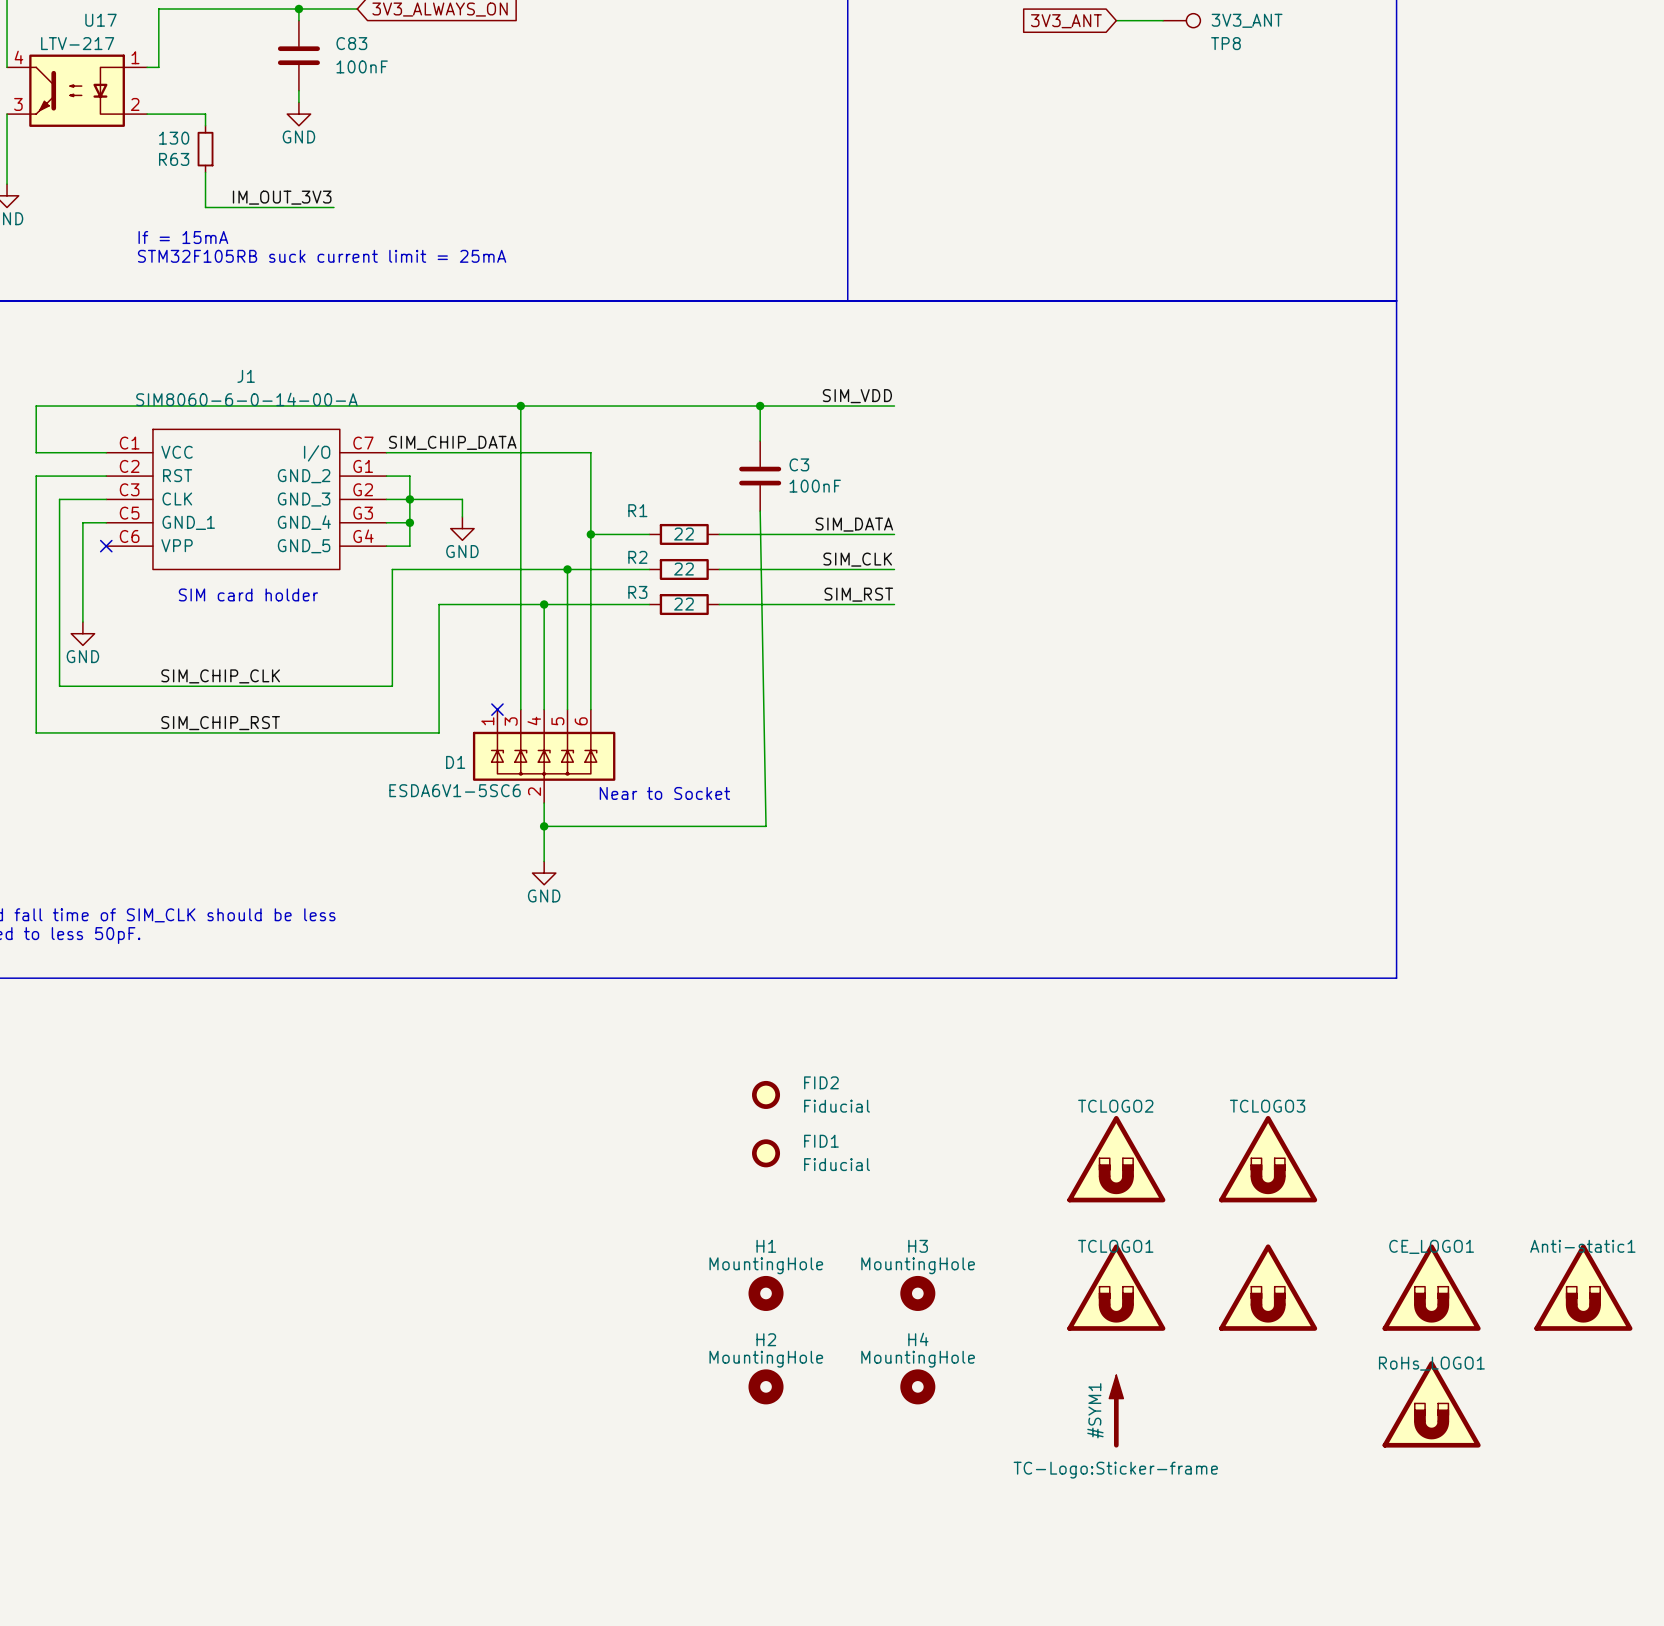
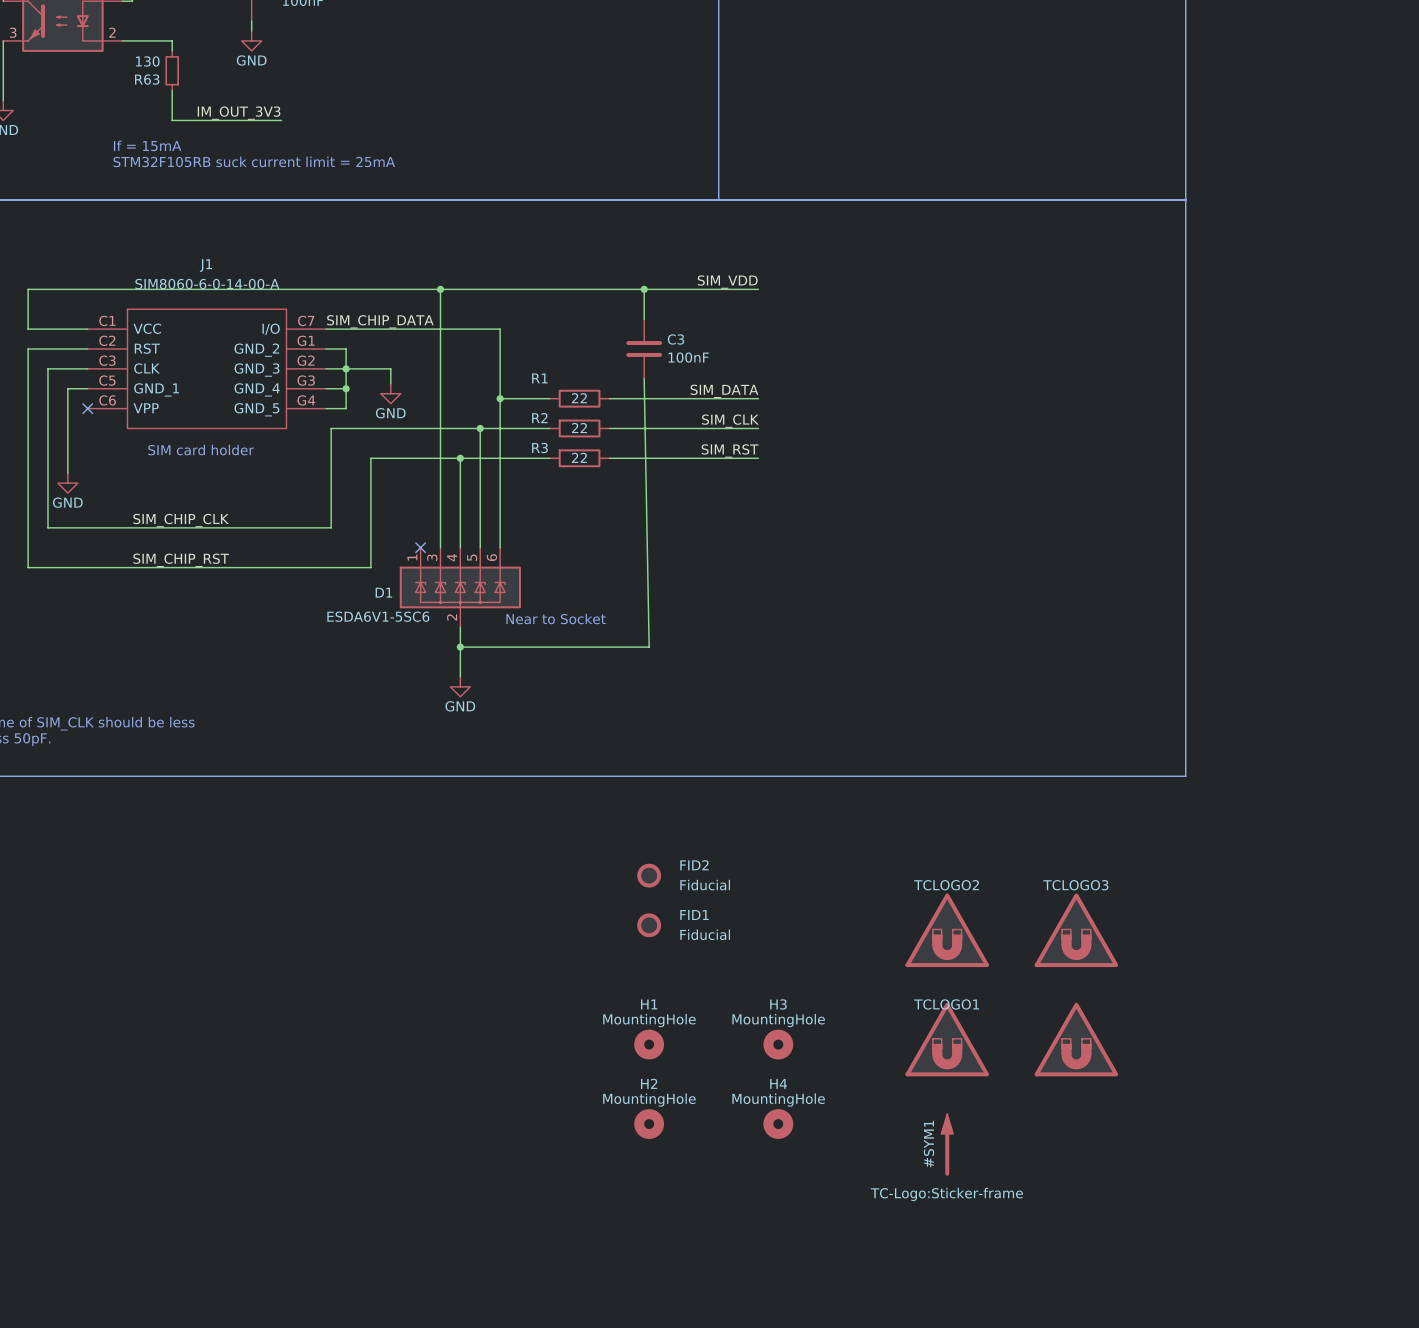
CE_LOGO1: (1431, 1287) -> none
Anti-static1: (1583, 1287) -> none
RoHs_LOGO1: (1431, 1404) -> none

